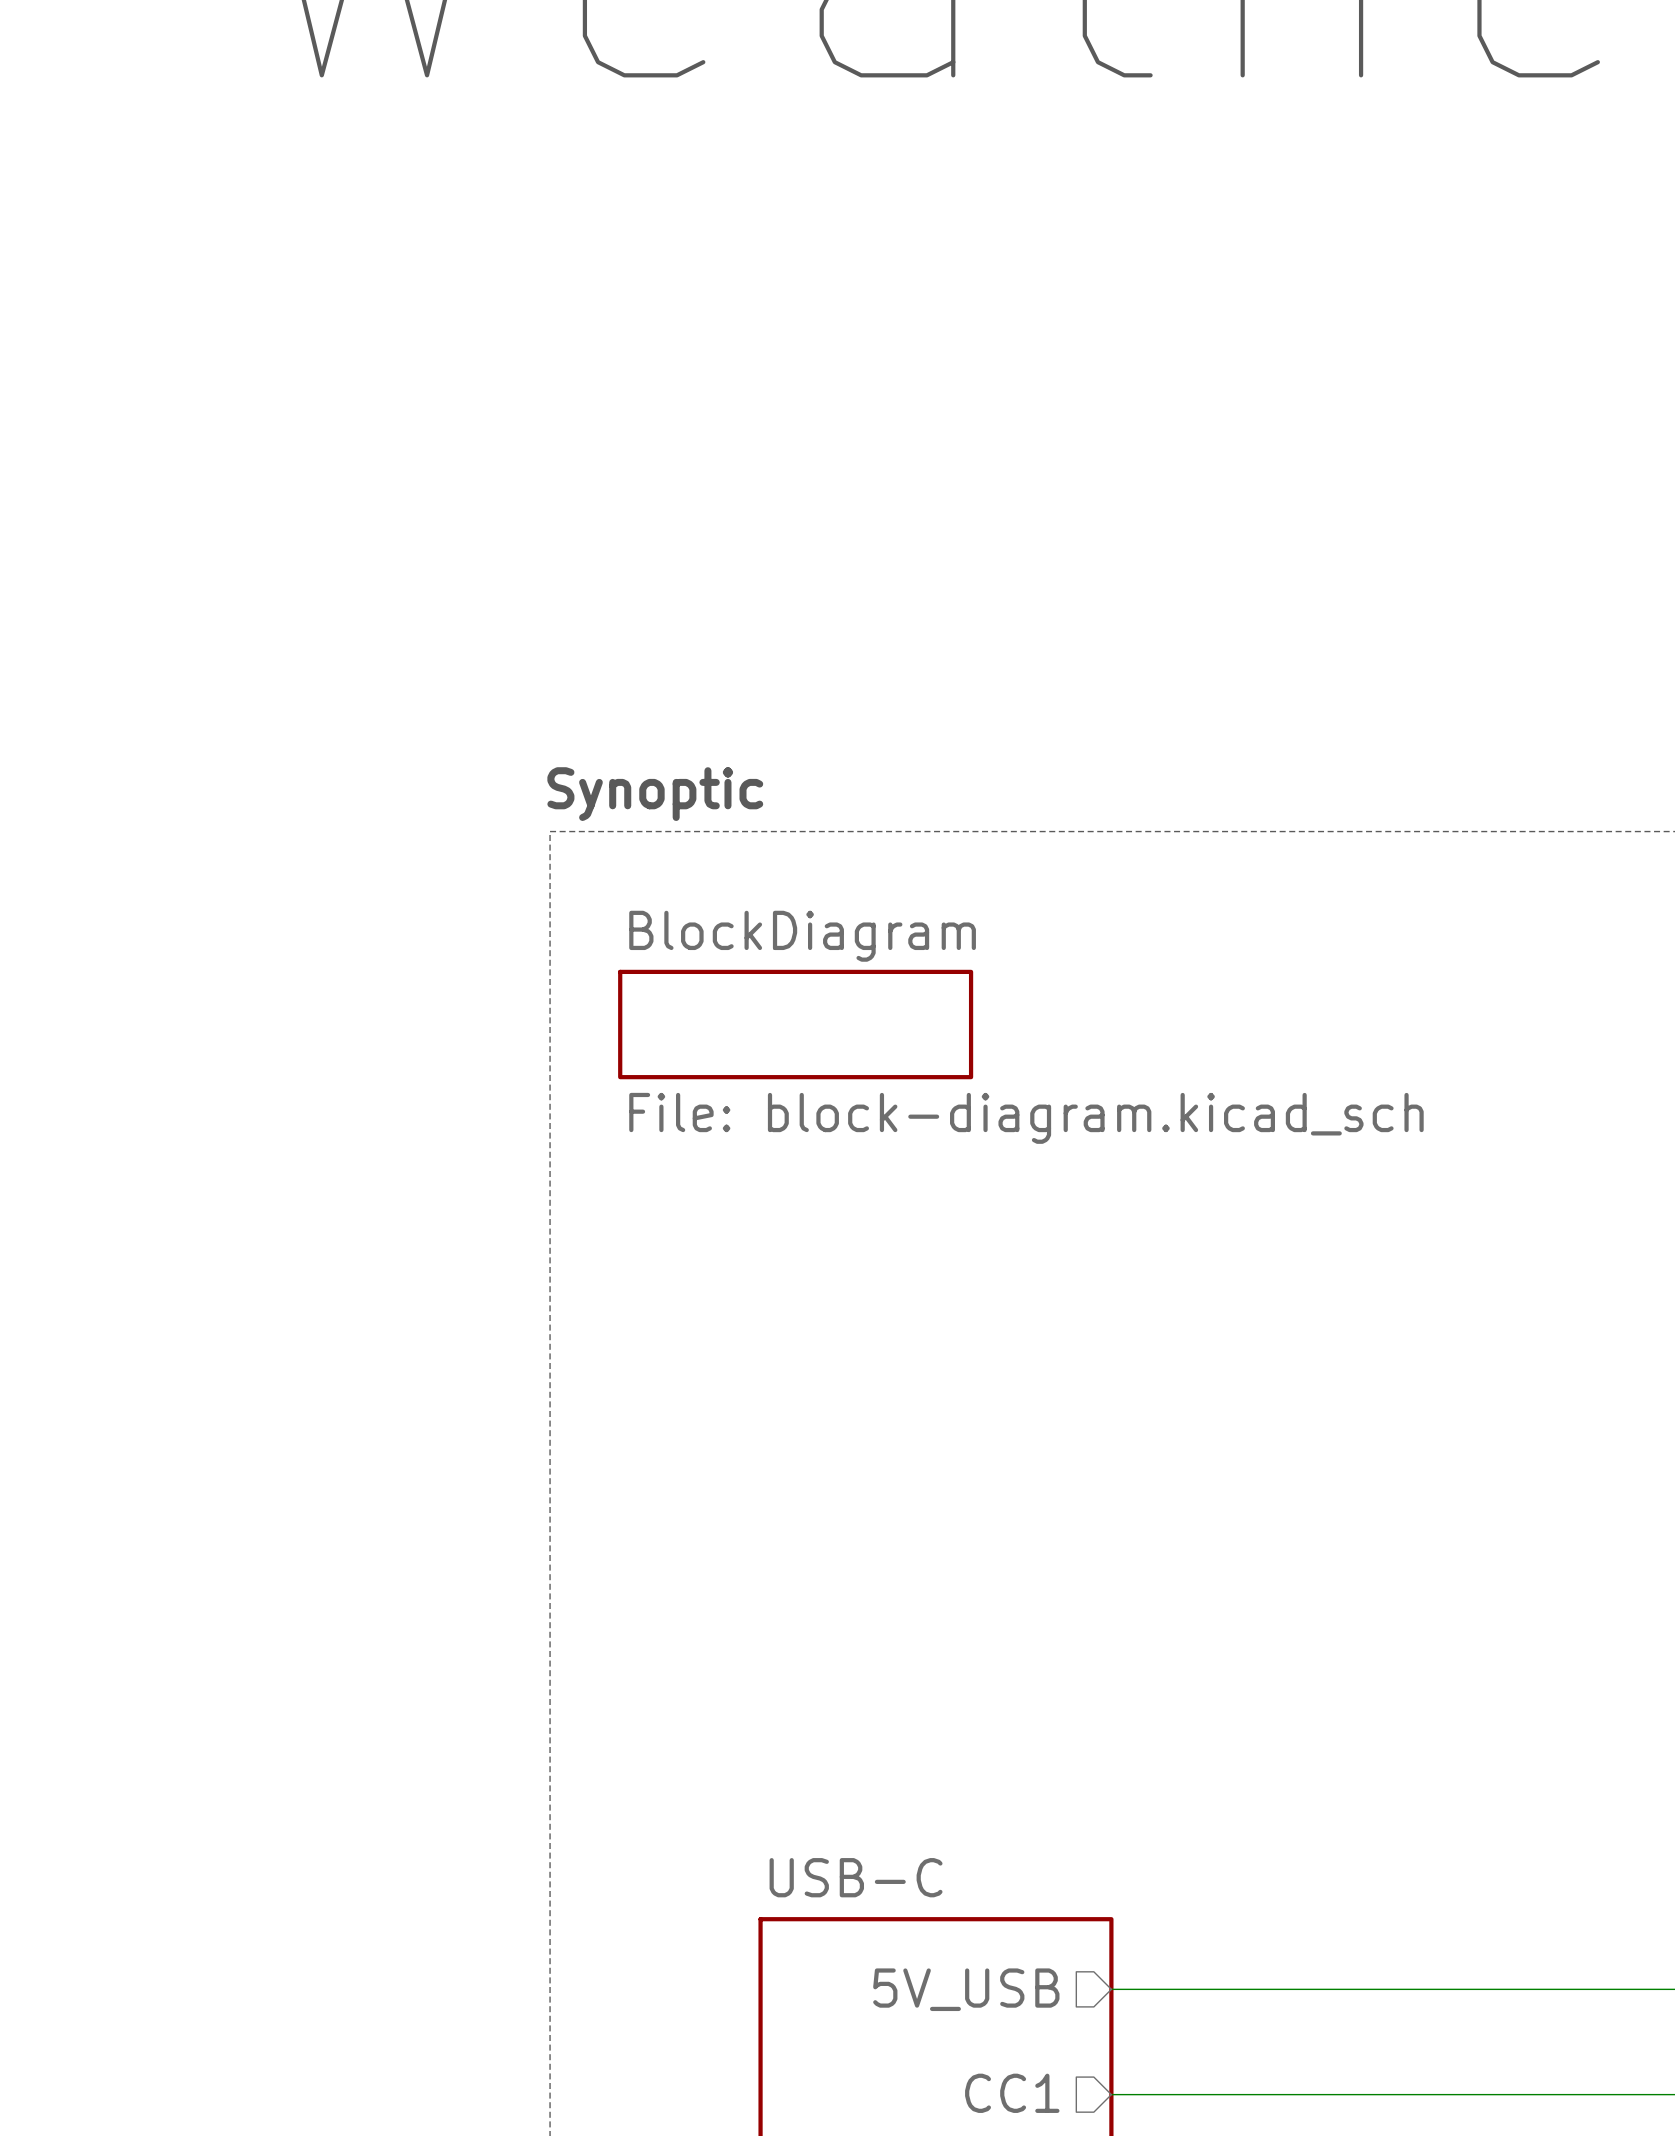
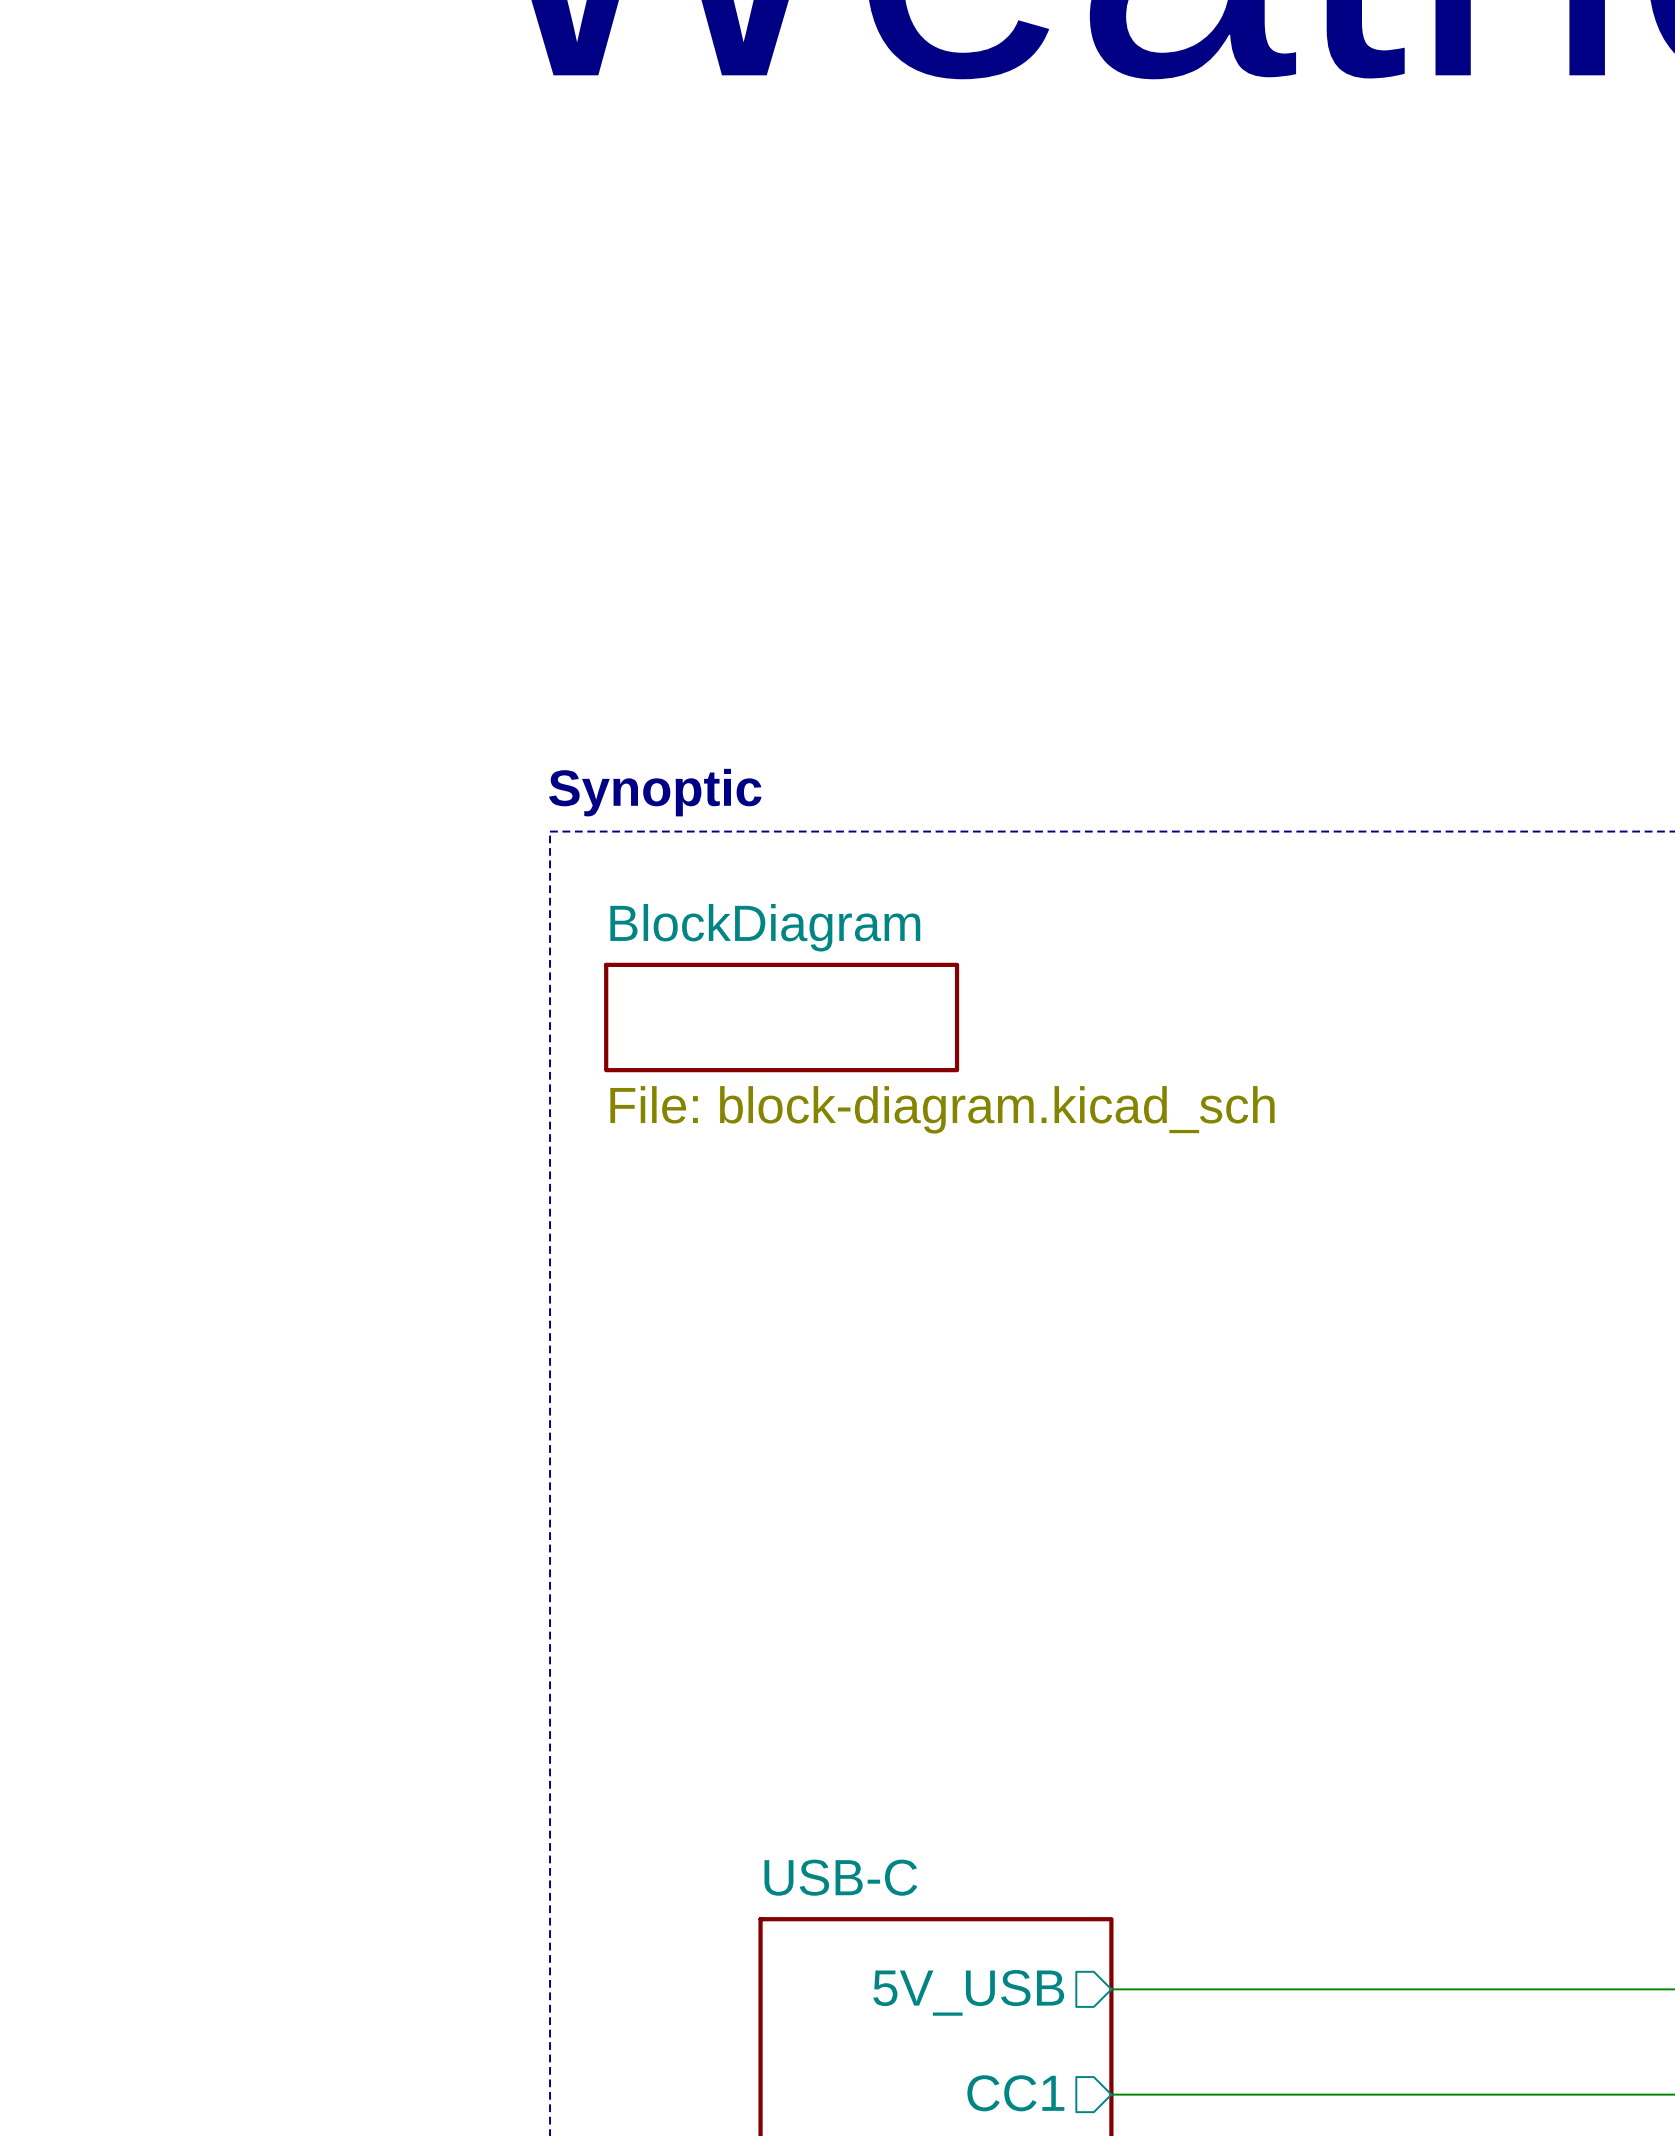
sheet BlockDiagram position: (795, 1024) -> (781, 1017)

